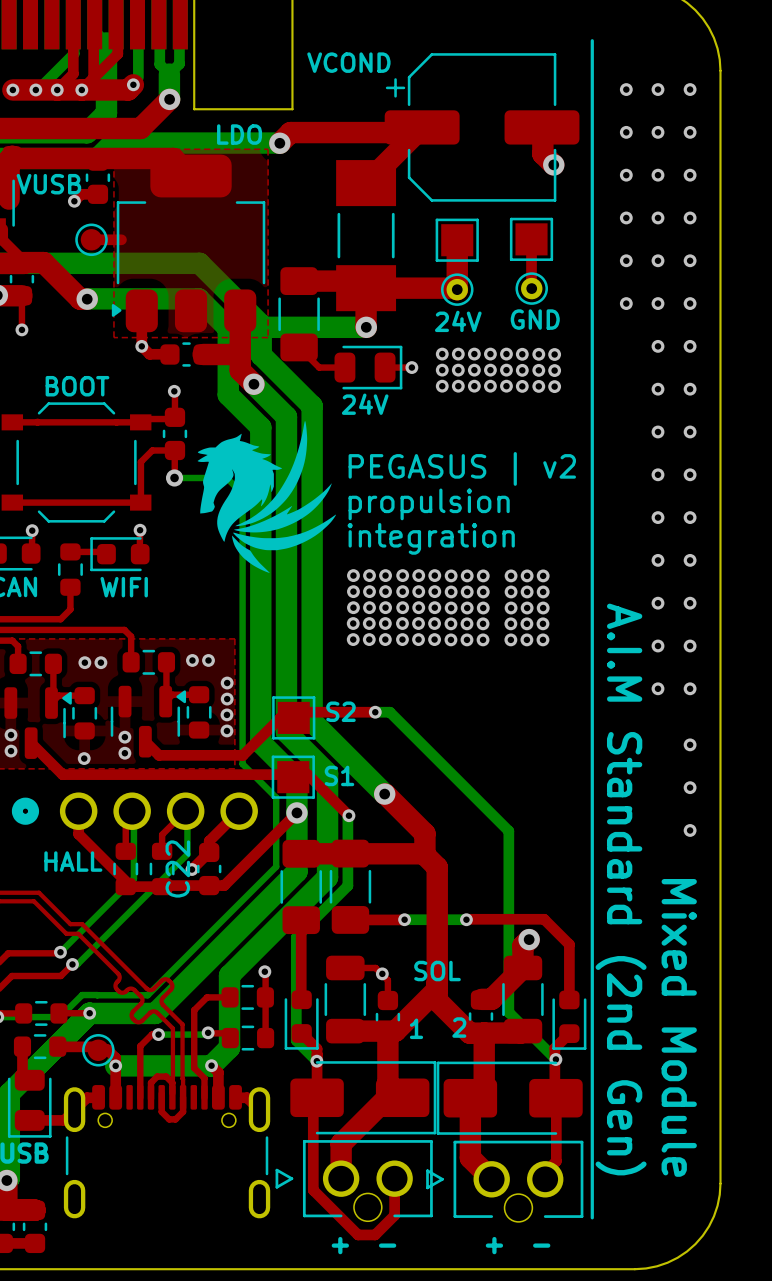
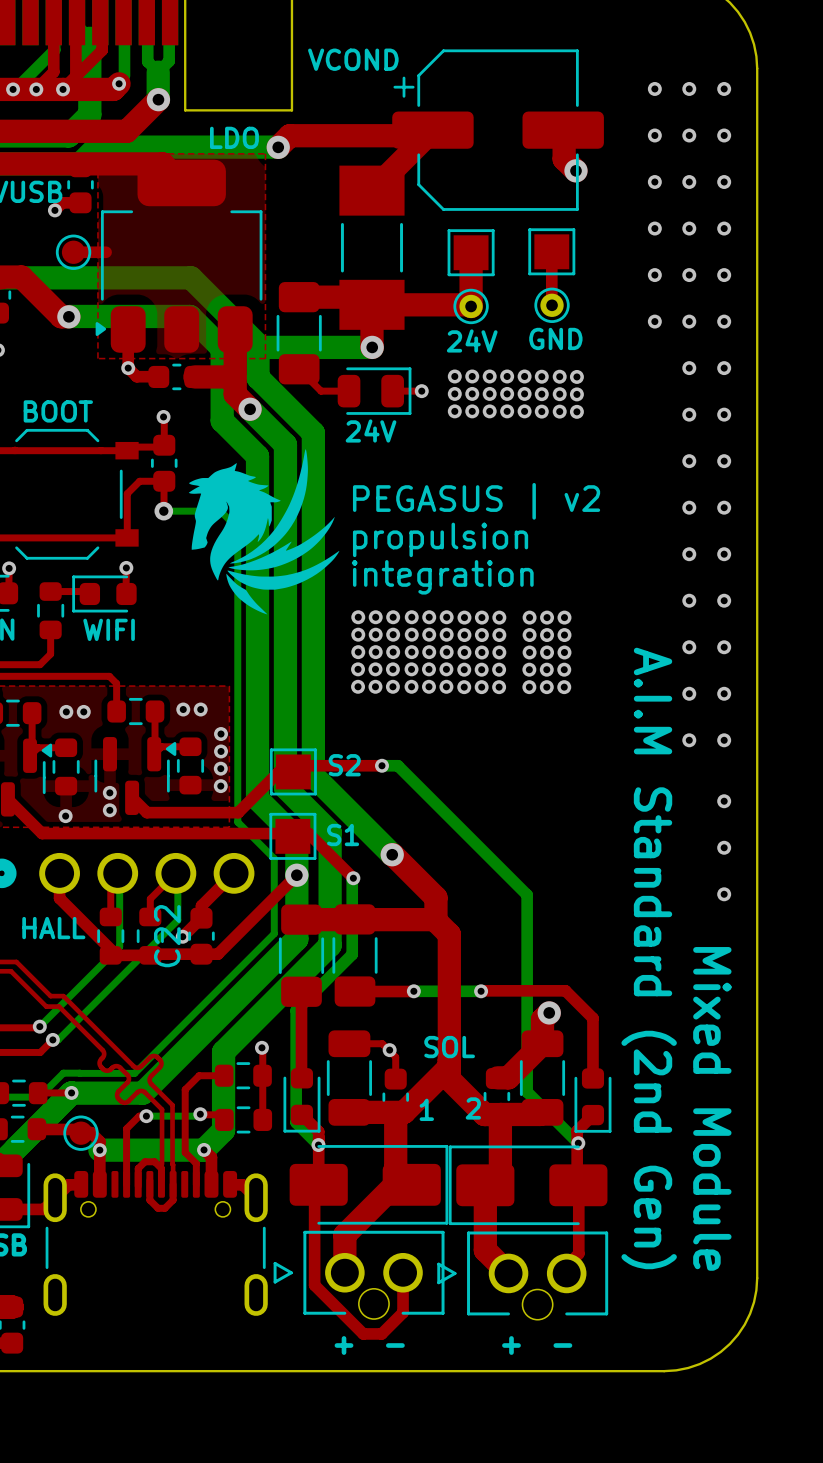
line: (592, 40) (592, 1217) -> none

